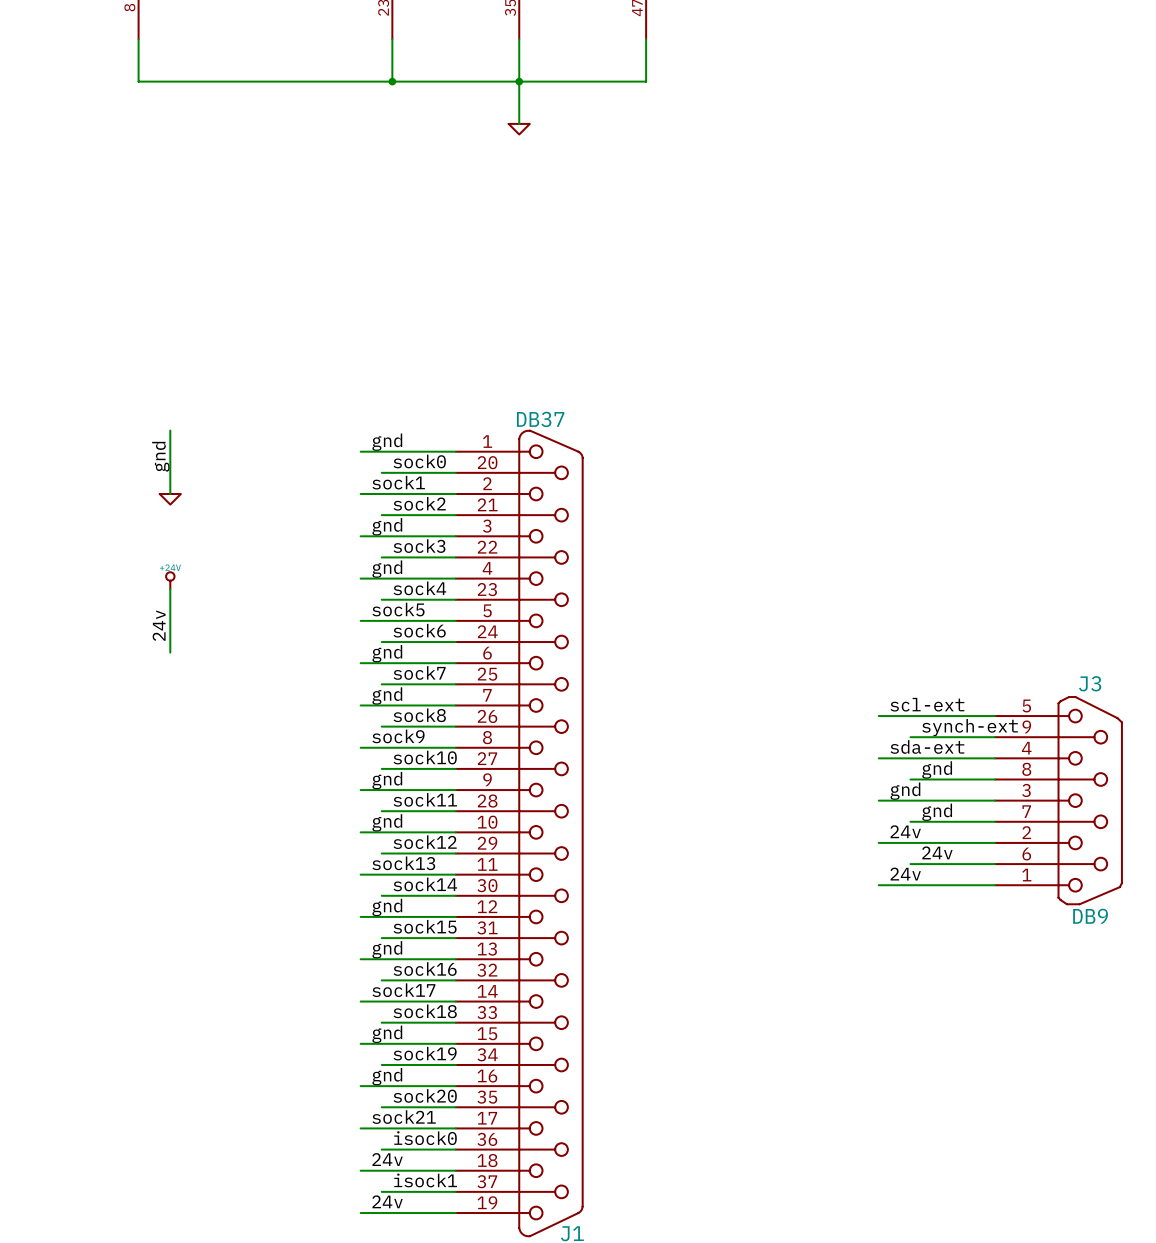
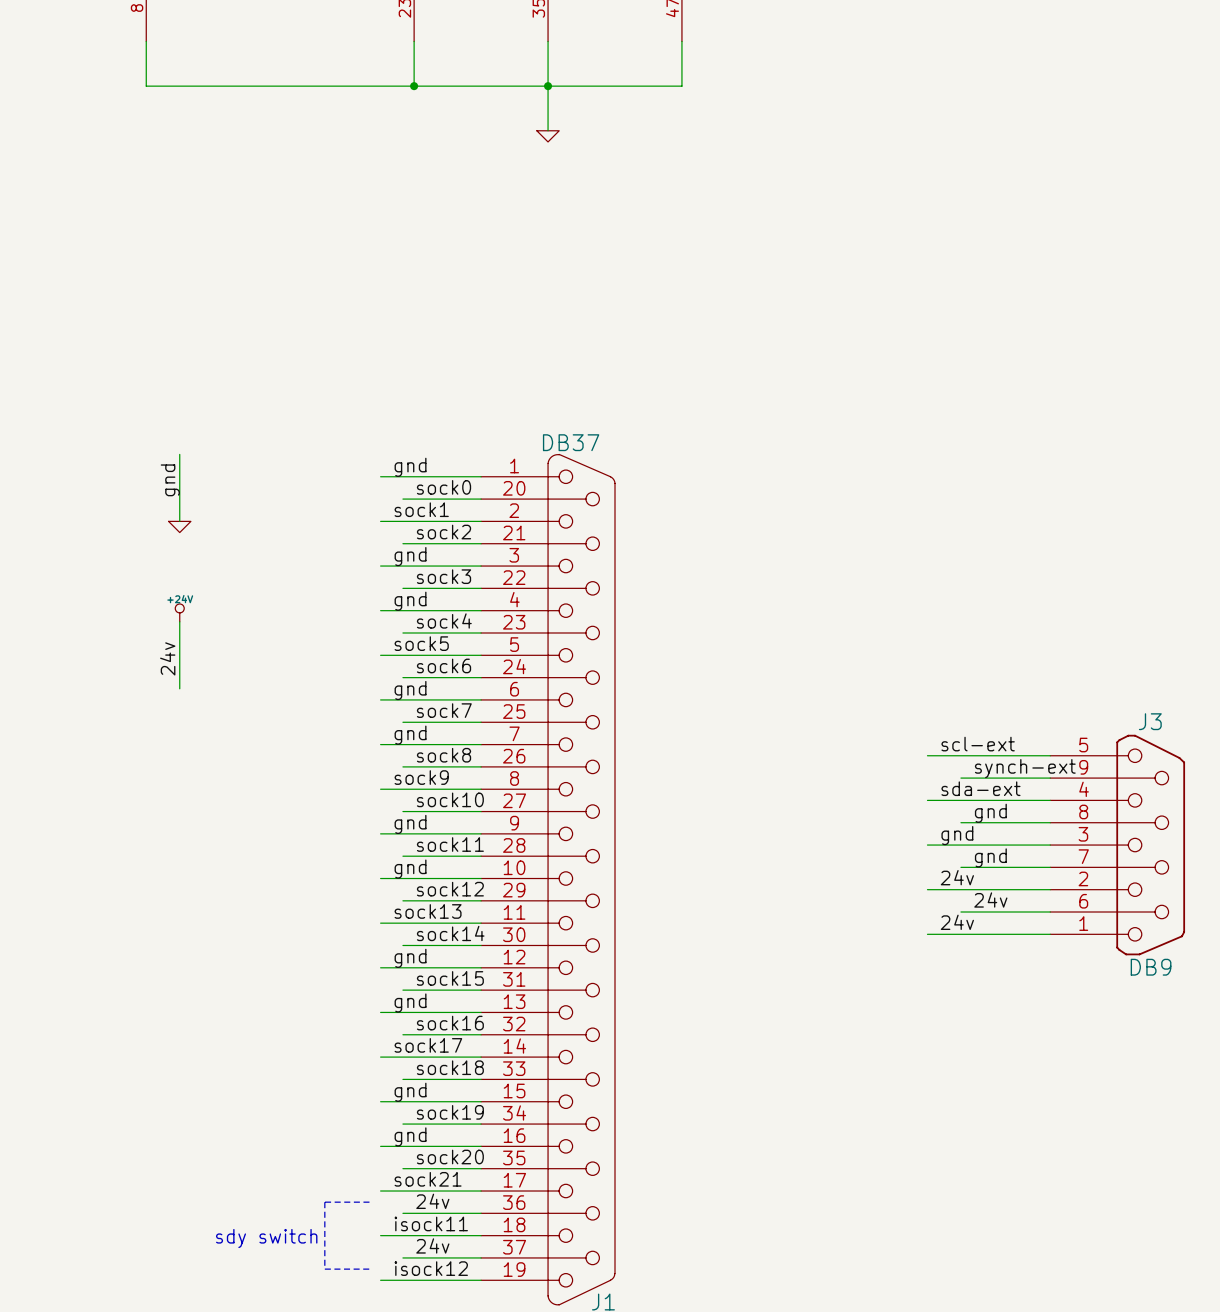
label: isock0 (425, 1138) -> 24v (432, 1201)
line: none -> (369, 1202) (324, 1202) (324, 1269) (369, 1269)
label: 24v (387, 1159) -> isock11 (431, 1223)
text: none -> sdy switch (266, 1238)
label: isock1 (425, 1180) -> 24v (432, 1245)
label: 24v (387, 1201) -> isock12 (431, 1268)

